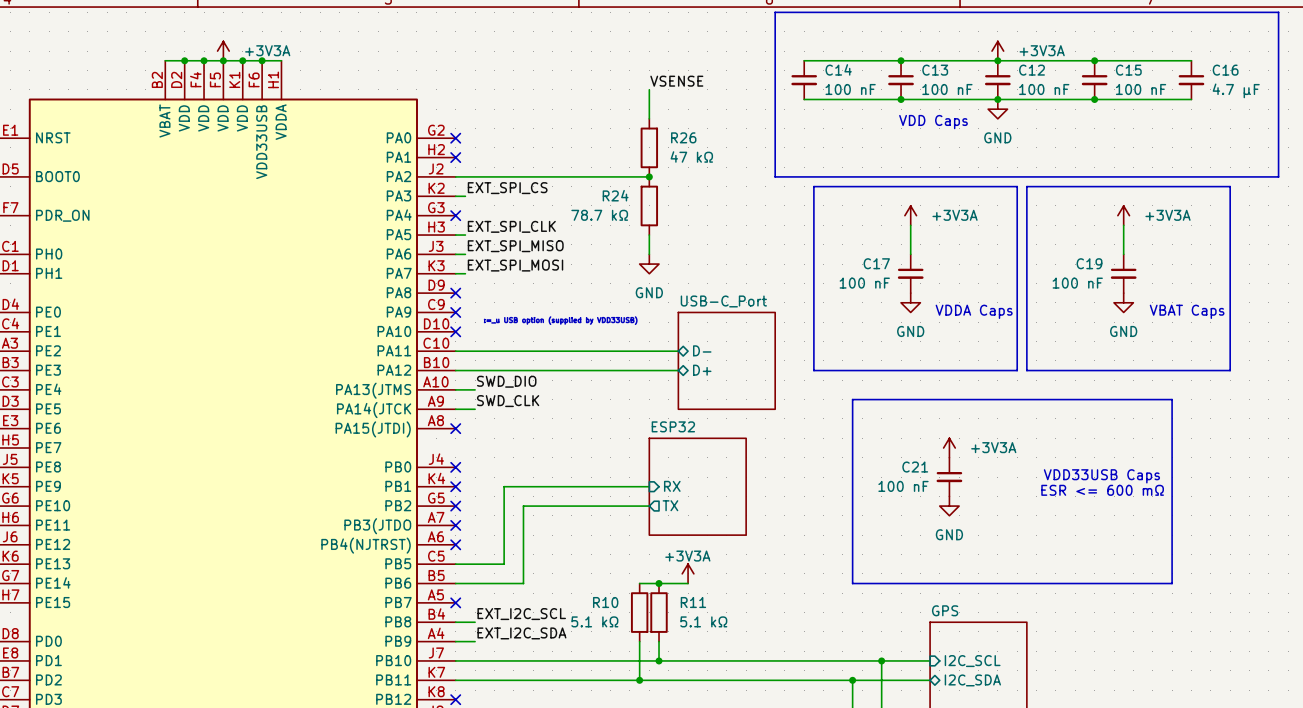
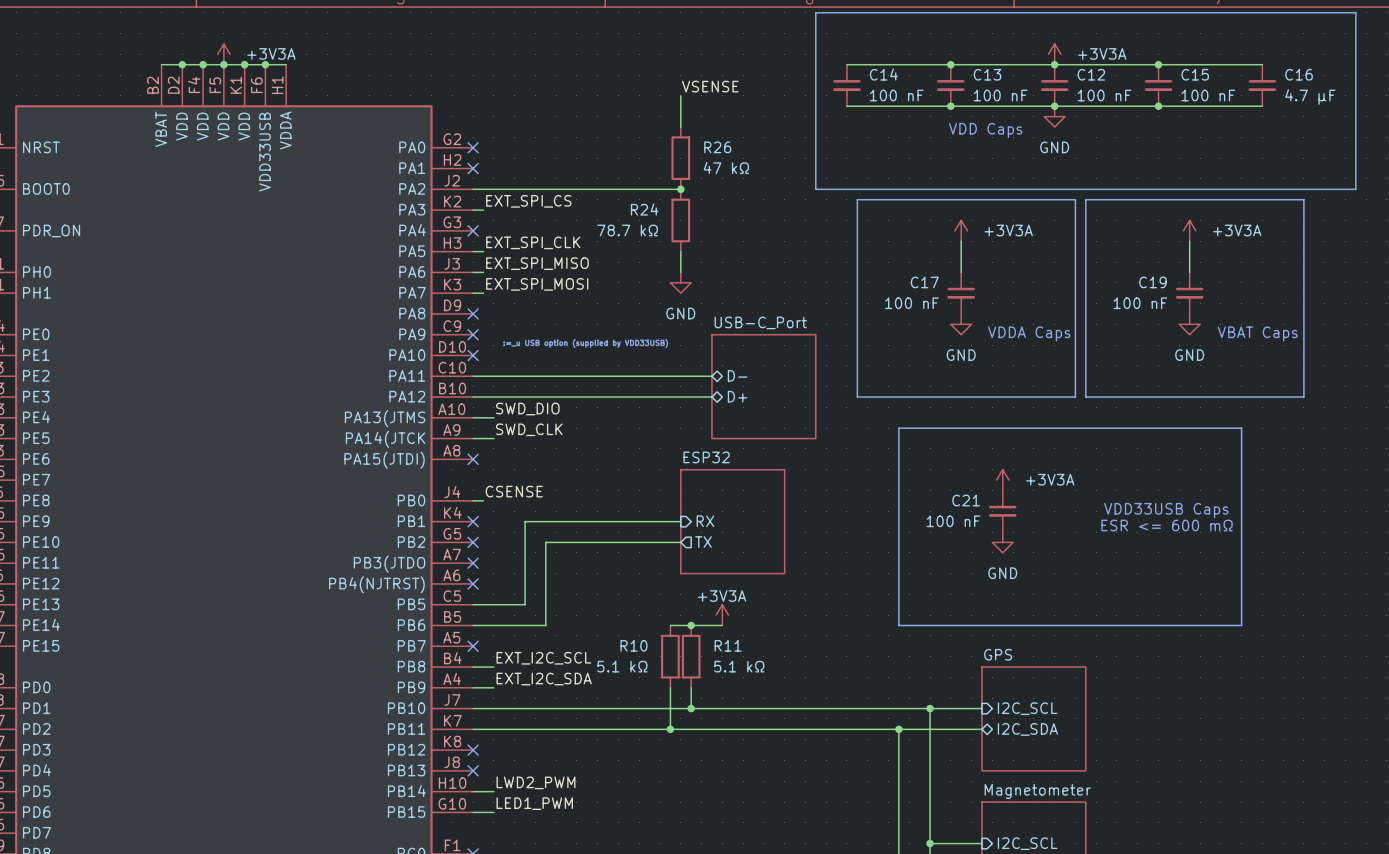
label: none -> CSENSE (514, 491)
wire: none -> (473, 500) (483, 500)
no-connect mark: (455, 467) -> none

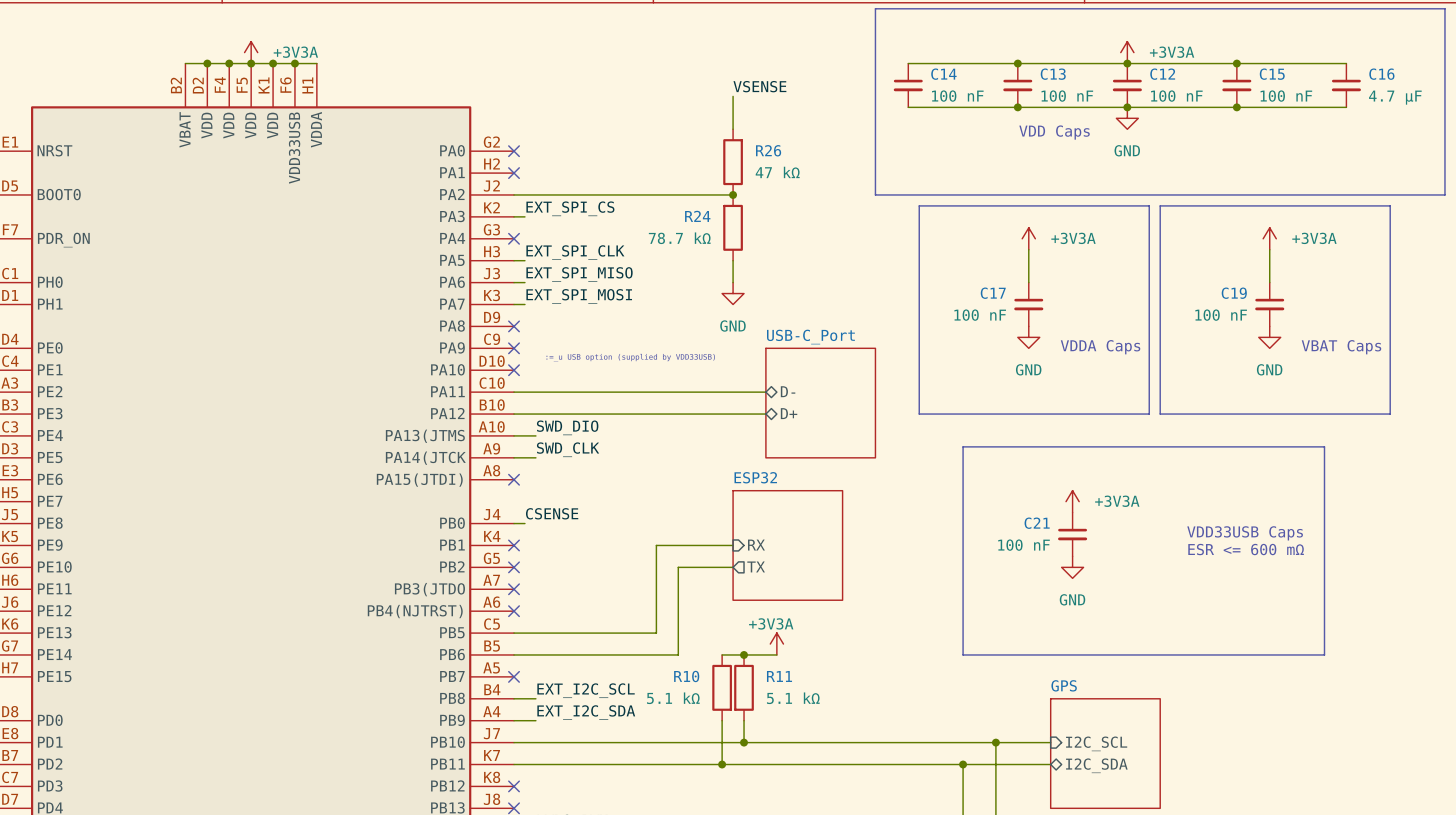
wire: (608, 521) (525, 521) (525, 604) -> (656, 545) (656, 633) (568, 633)
wire: (628, 542) (545, 542) (545, 625) -> (678, 567) (678, 654) (590, 654)

